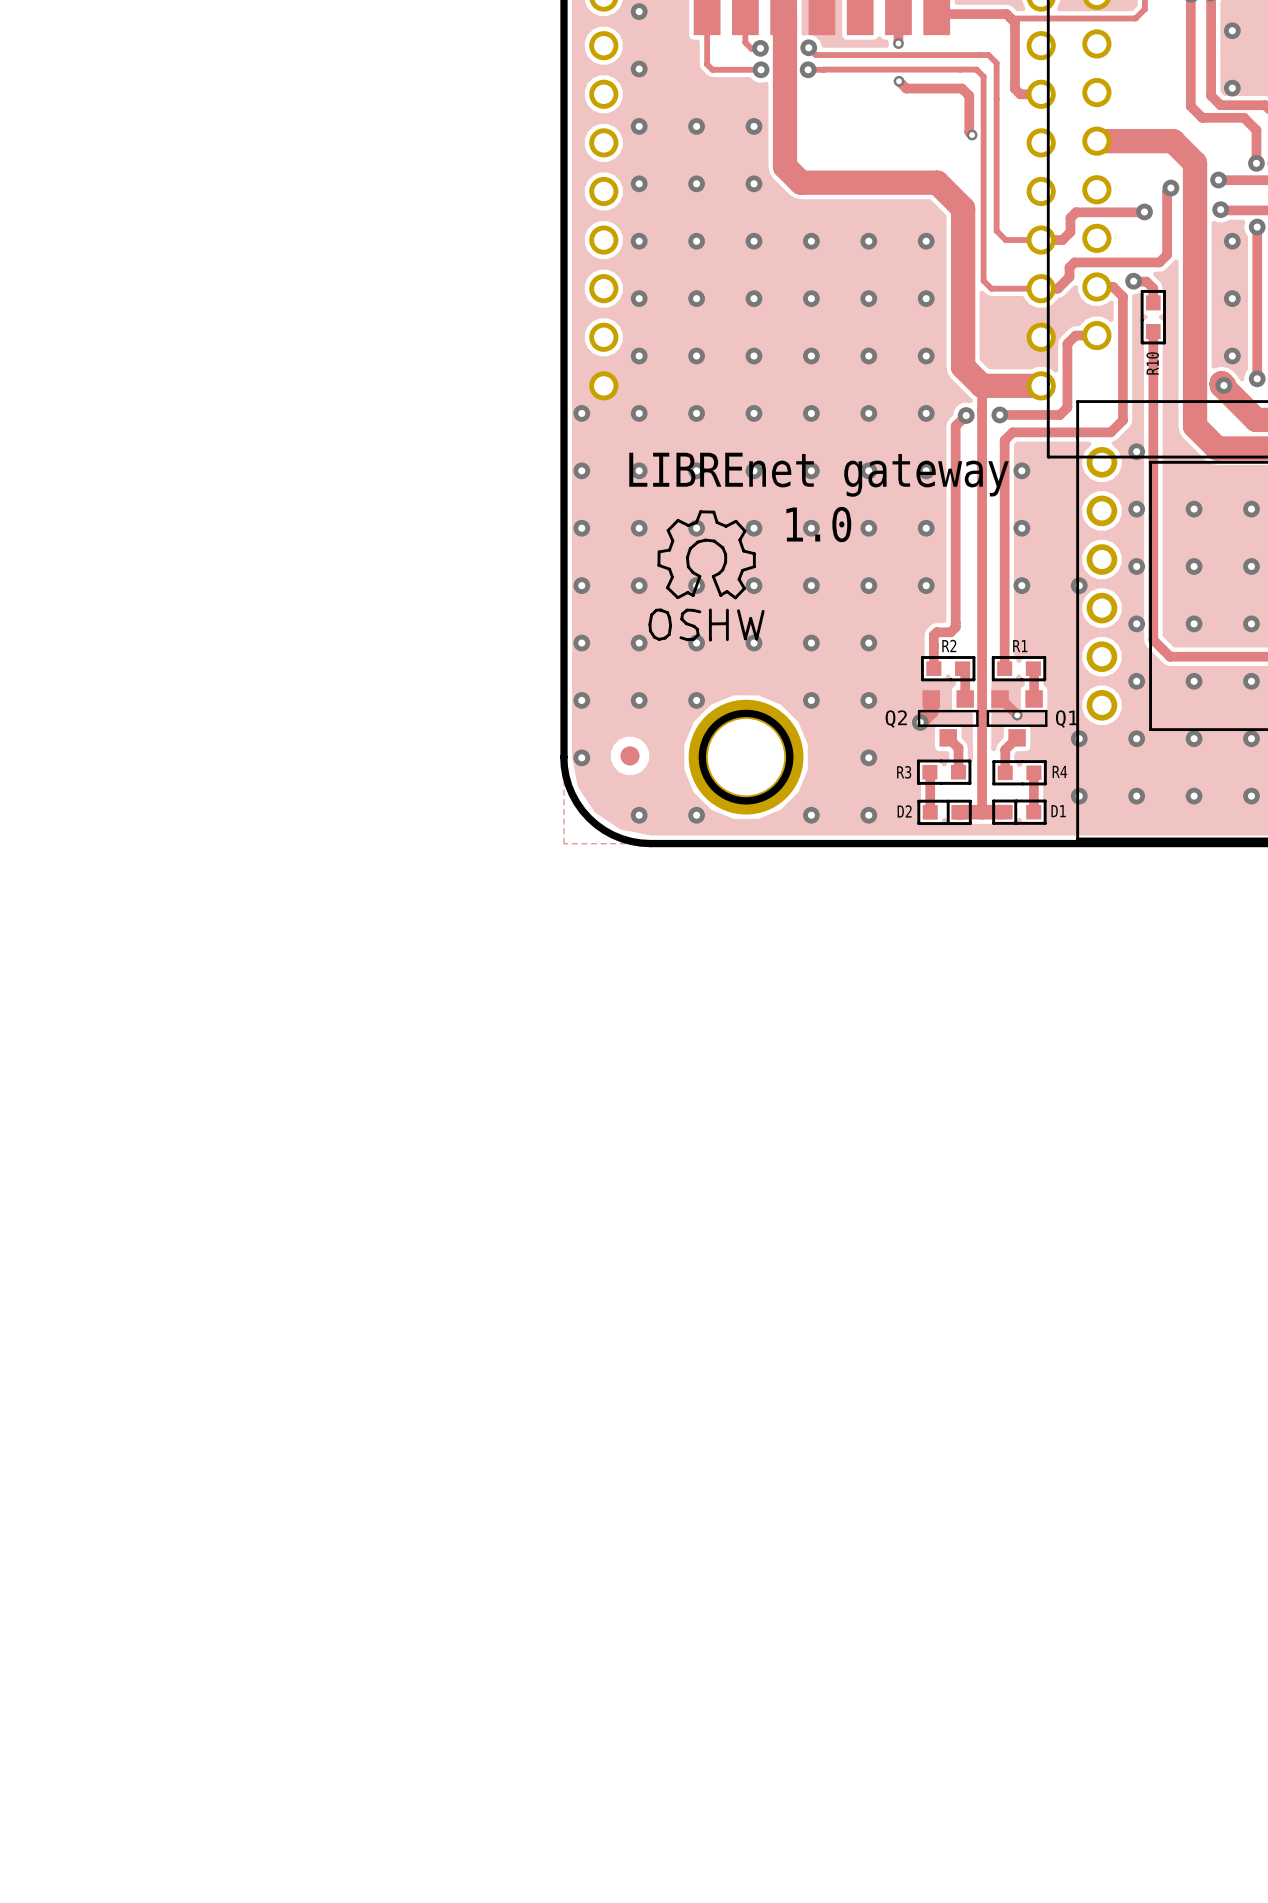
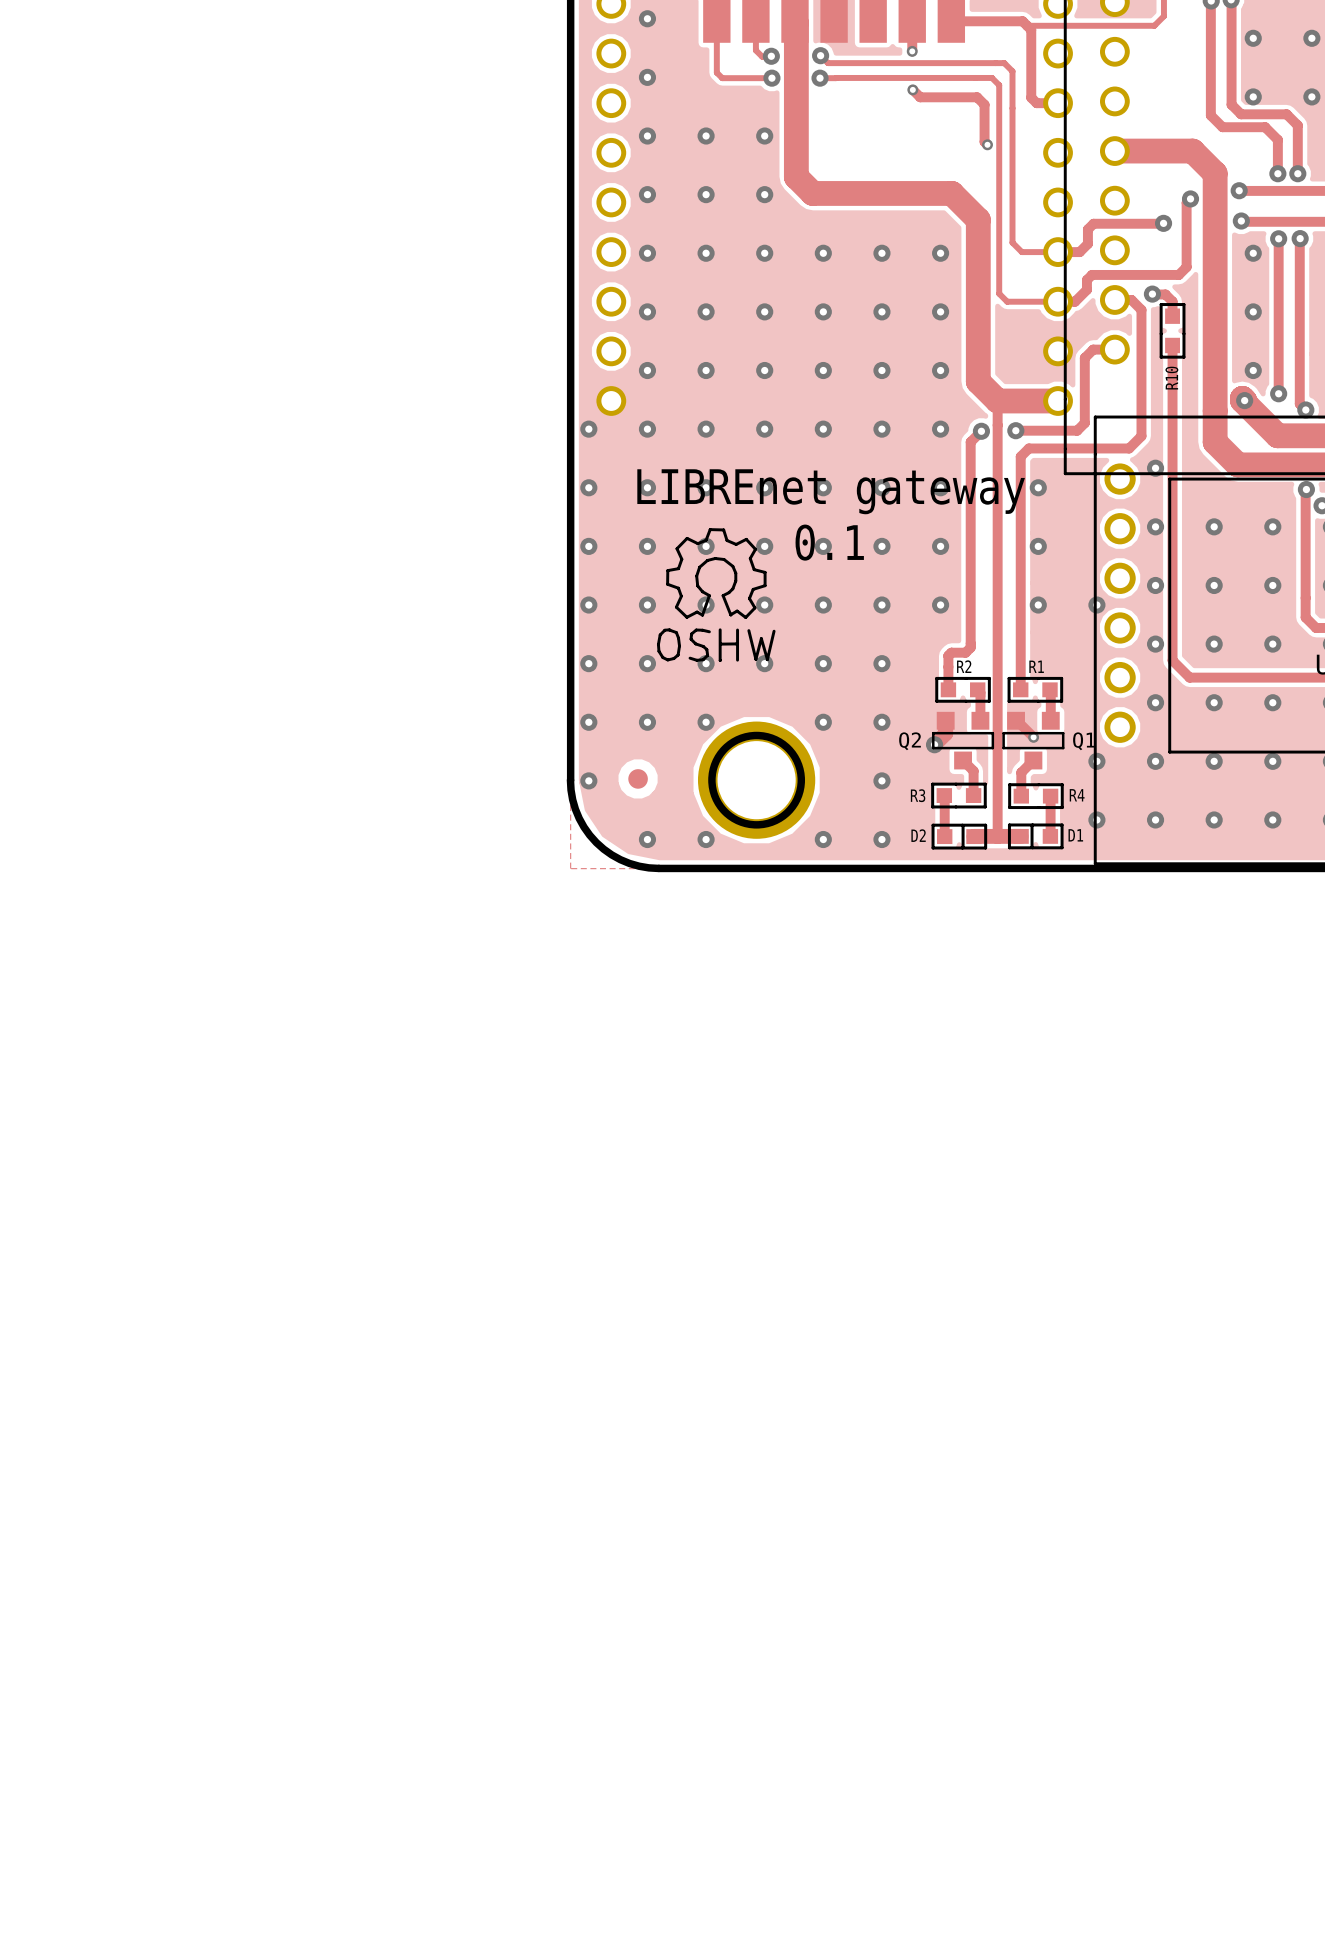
text: 1.0 (818, 524) -> 0.1 (829, 542)

